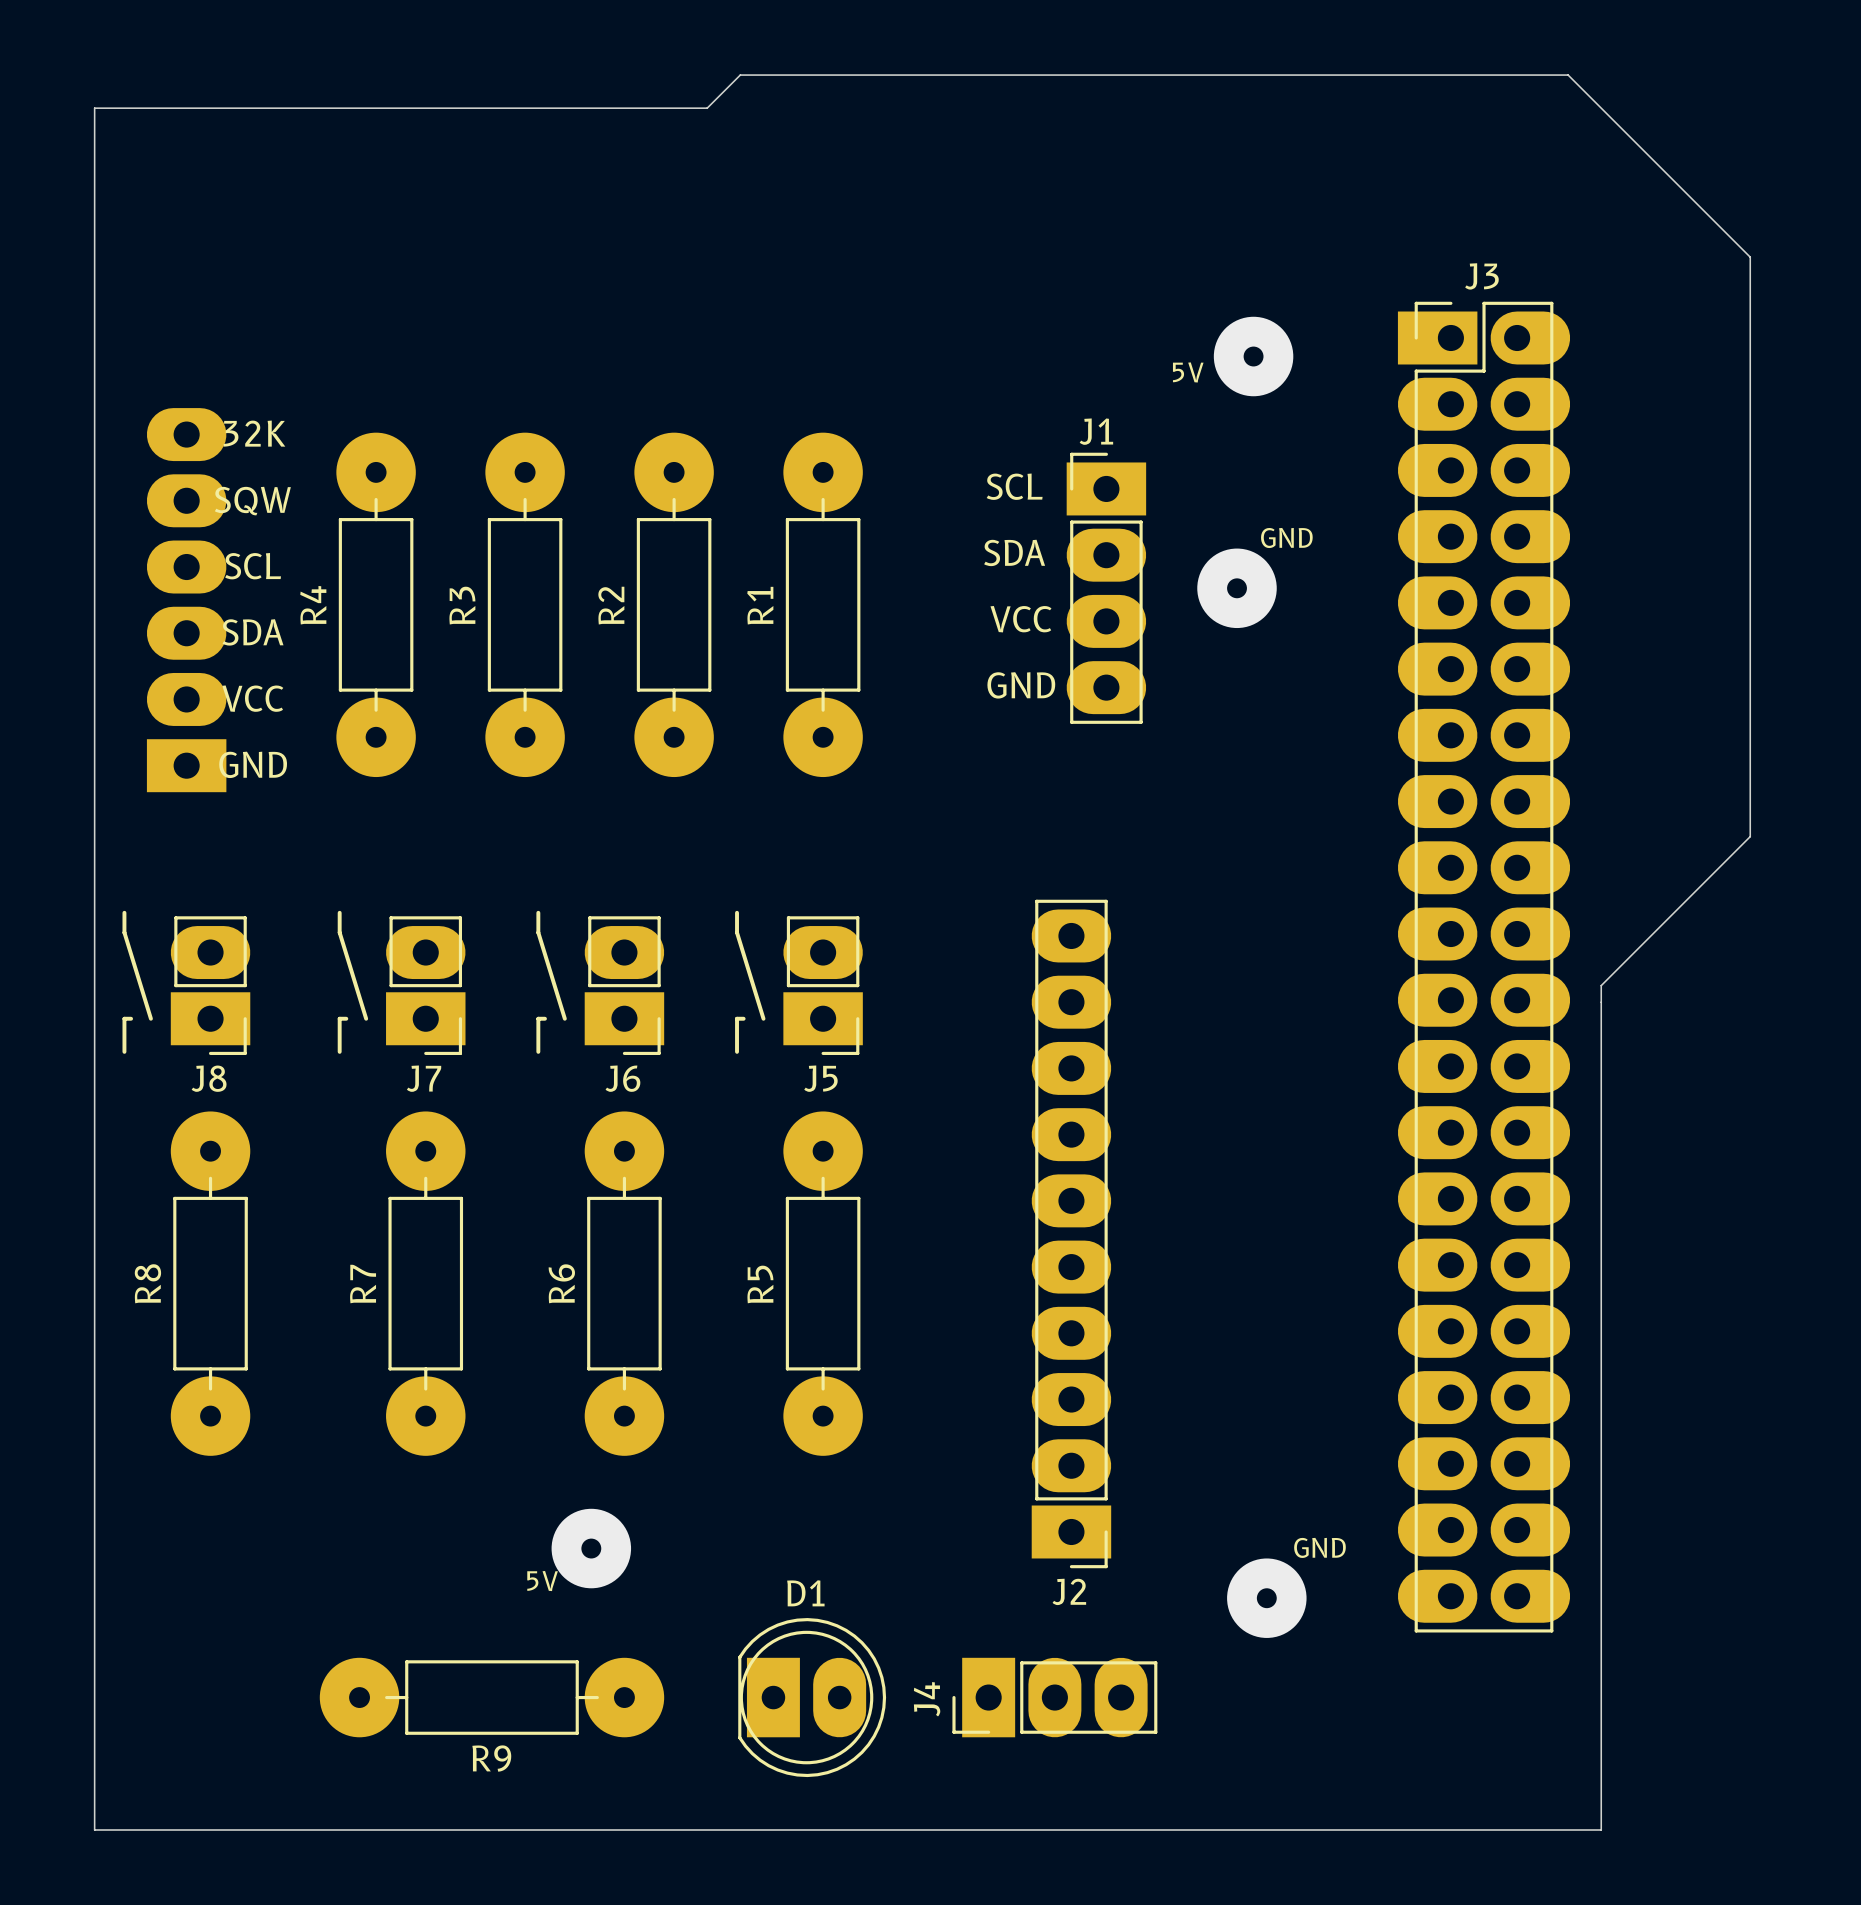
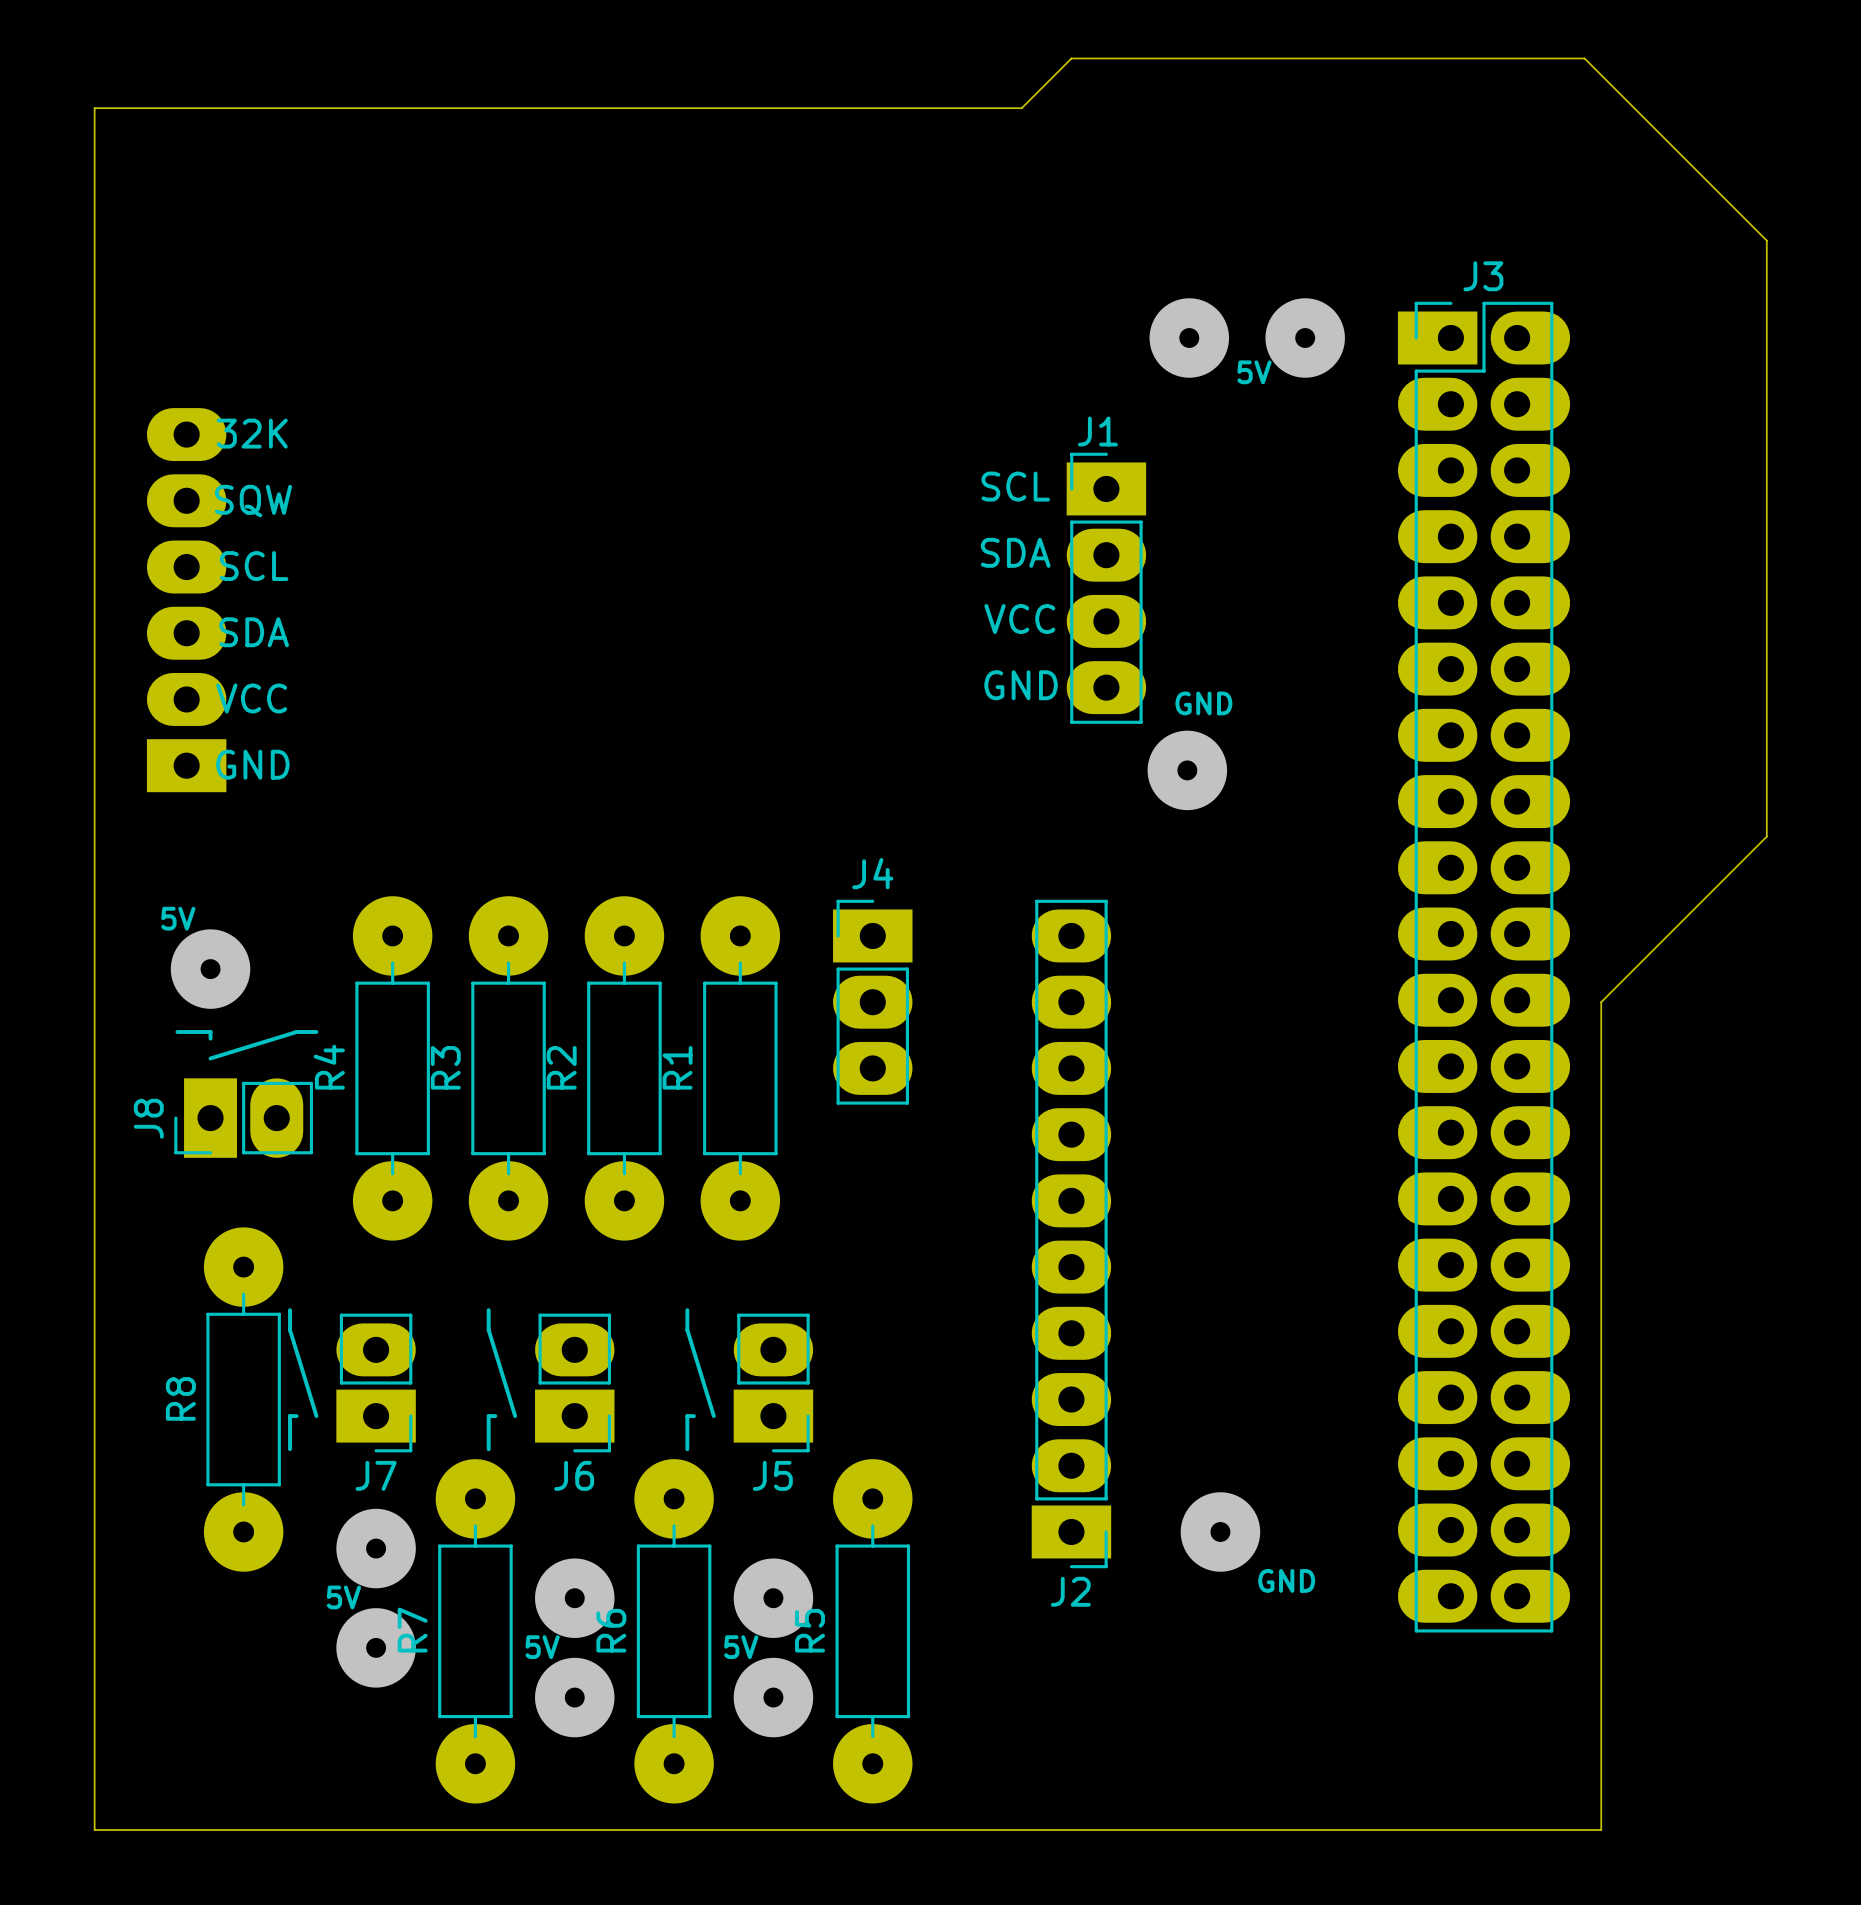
board edge: (707, 108) (740, 75) (1568, 75) (1750, 257) (1750, 836) (1601, 985) (1601, 1002) -> (707, 108) (1021, 108) (1071, 58) (1584, 58) (1766, 240) (1766, 836) (1601, 1002)
via: none -> (1189, 338)
via: none -> (1305, 338)
via: (1253, 356) -> none
text position: 5V (1188, 372) -> 5V (1254, 372)
text position: GND (1286, 537) -> GND (1203, 703)
via: (1237, 588) -> none
R4 position: (376, 604) -> (392, 1068)
R3 position: (525, 604) -> (508, 1068)
R2 position: (674, 604) -> (624, 1068)
R1 position: (823, 604) -> (740, 1068)
via: none -> (1187, 770)
text: none -> 5V (178, 918)
via: none -> (210, 969)
J8 rotation: 0° (186, 982) -> 90° clockwise (246, 1093)
J8 position: (186, 982) -> (246, 1093)
J7 position: (401, 982) -> (351, 1380)
J6 position: (600, 982) -> (550, 1380)
J5 position: (798, 982) -> (749, 1380)
R8 position: (210, 1283) -> (243, 1399)
R7 position: (425, 1283) -> (475, 1631)
R6 position: (624, 1283) -> (674, 1631)
R5 position: (823, 1283) -> (872, 1631)
text position: GND (1319, 1547) -> GND (1286, 1580)
via: none -> (376, 1548)
via position: (591, 1548) -> (574, 1598)
text position: 5V (542, 1581) -> 5V (542, 1647)
text: none -> 5V (343, 1597)
via: none -> (773, 1598)
via position: (1266, 1598) -> (1220, 1531)
via: none -> (376, 1647)
text: none -> 5V (741, 1647)
R9: (491, 1697) -> none
via: none -> (574, 1697)
via: none -> (773, 1697)
D1: (812, 1697) -> none
J4 rotation: 0° (1054, 1697) -> 90° clockwise (872, 1002)
J4 position: (1054, 1697) -> (872, 1002)

